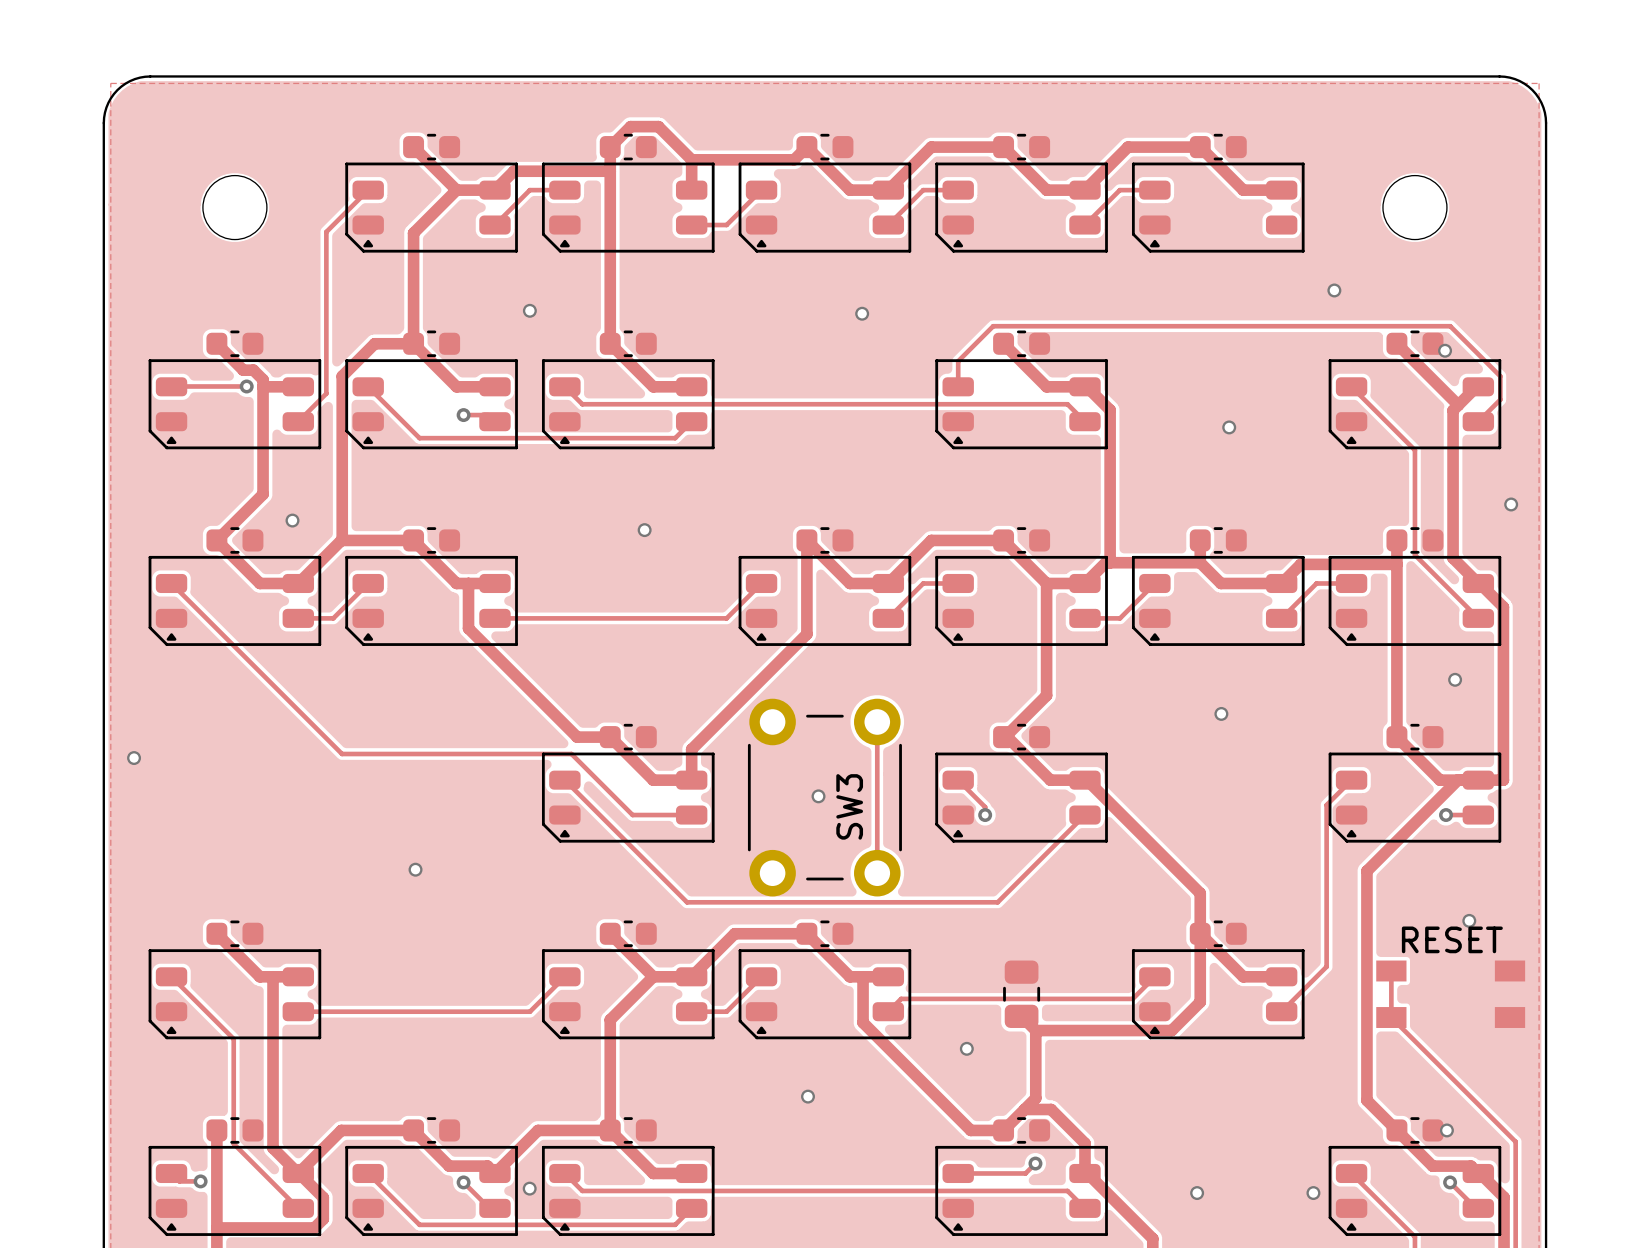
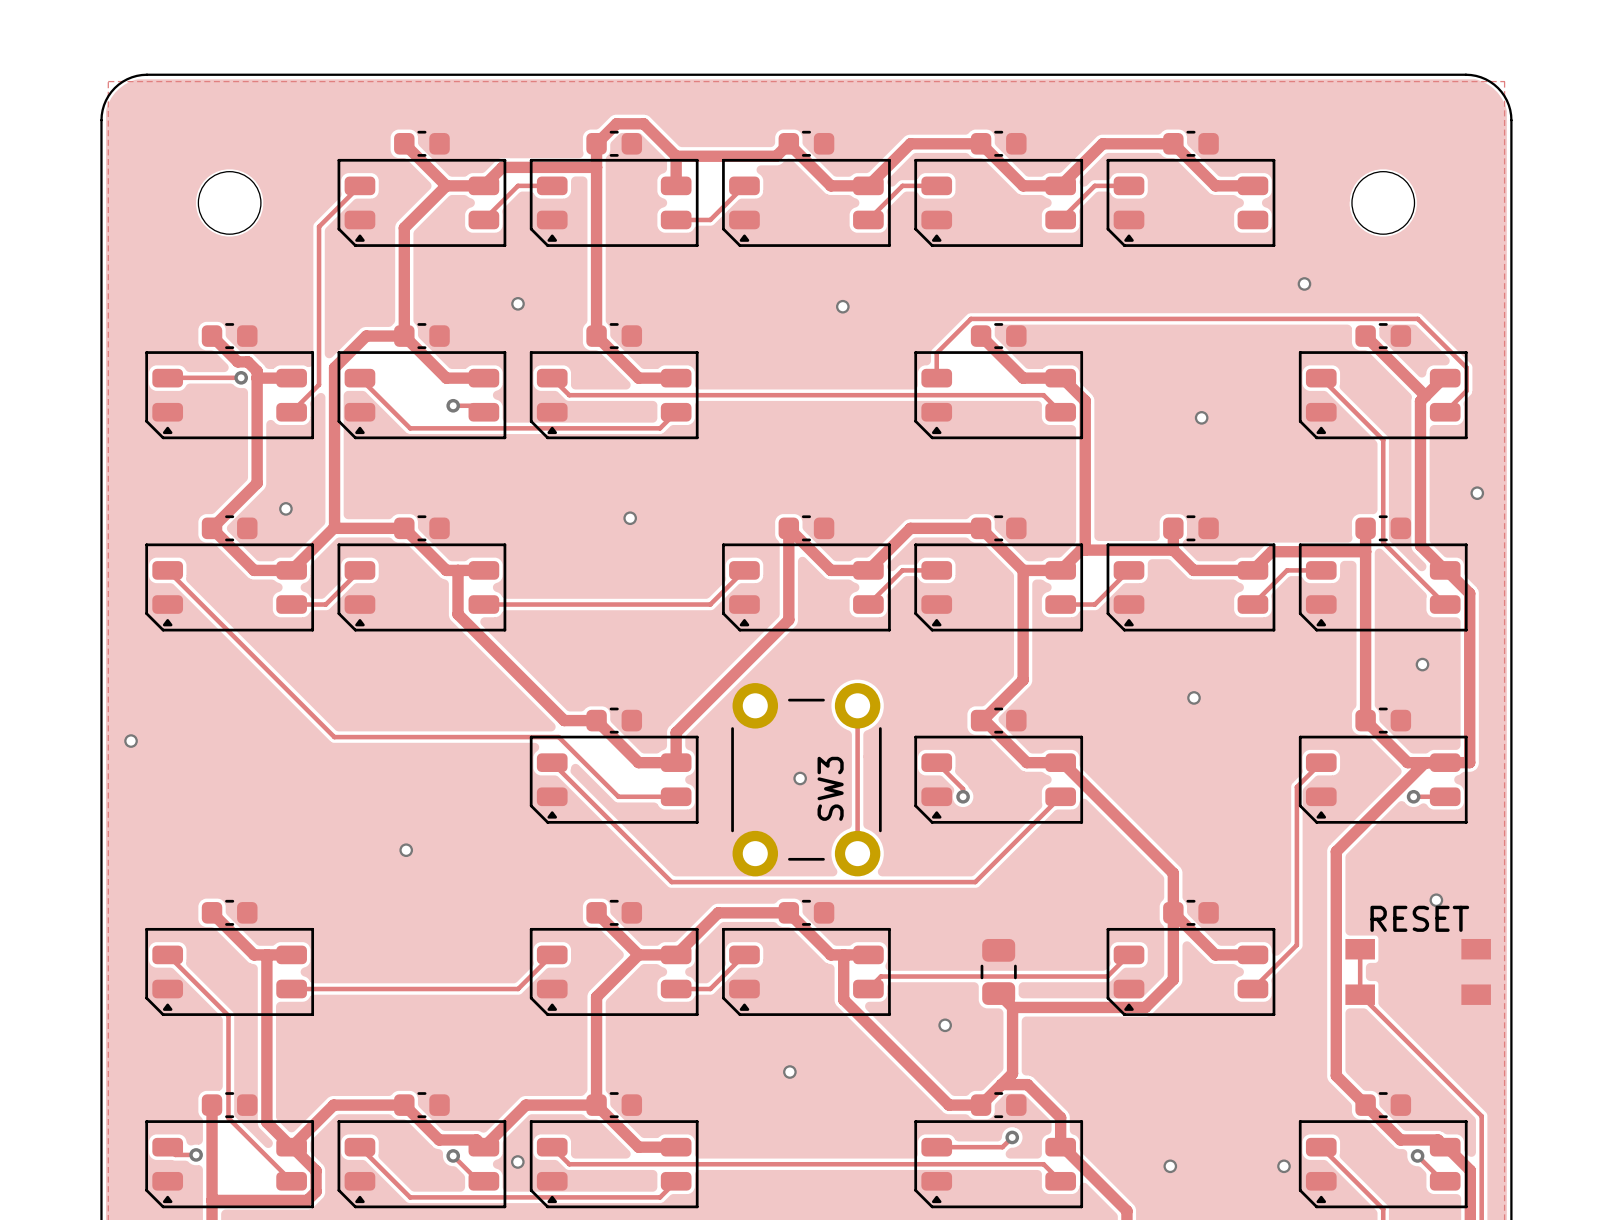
via: (1445, 350) -> none
via: (1446, 1130) -> none

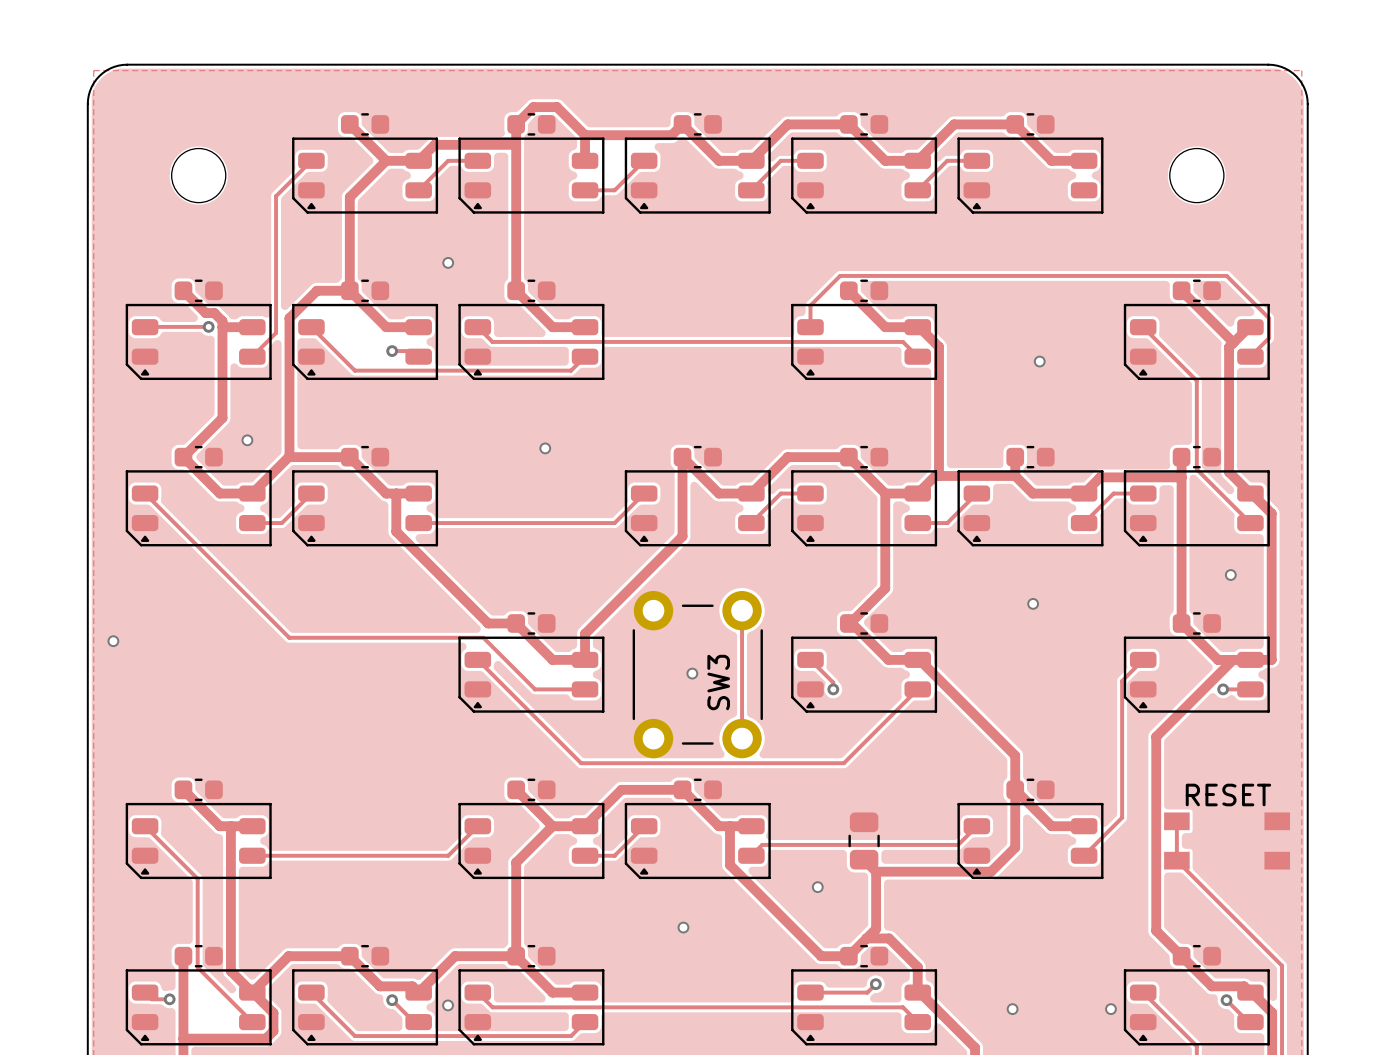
via: (1304, 283) -> none
via: (842, 306) -> none
via: (1477, 493) -> none
via: (406, 850) -> none
via: (1436, 900) -> none
RESET text: none -> RESET (1228, 794)
RESET name: RESET (1419, 918) -> none

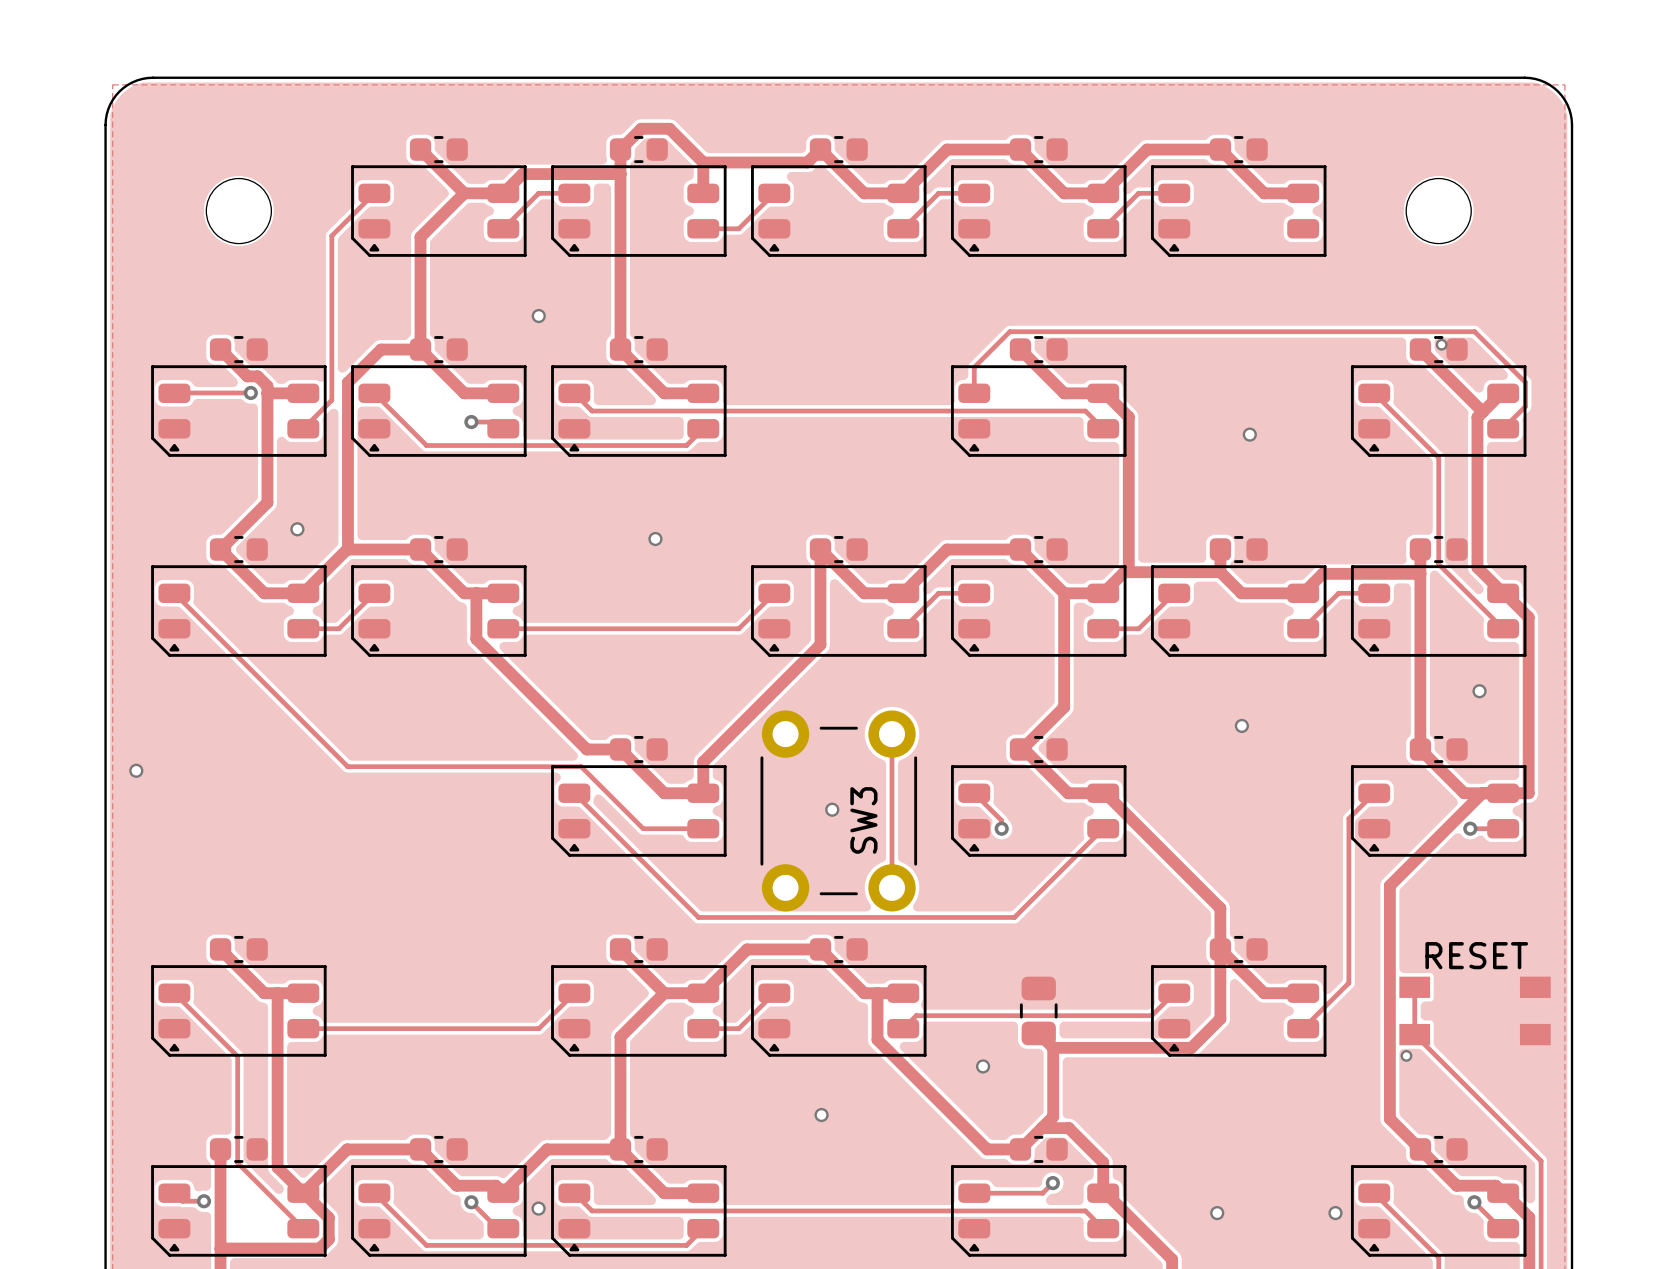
via: none -> (1441, 344)
via: none -> (1406, 1055)

